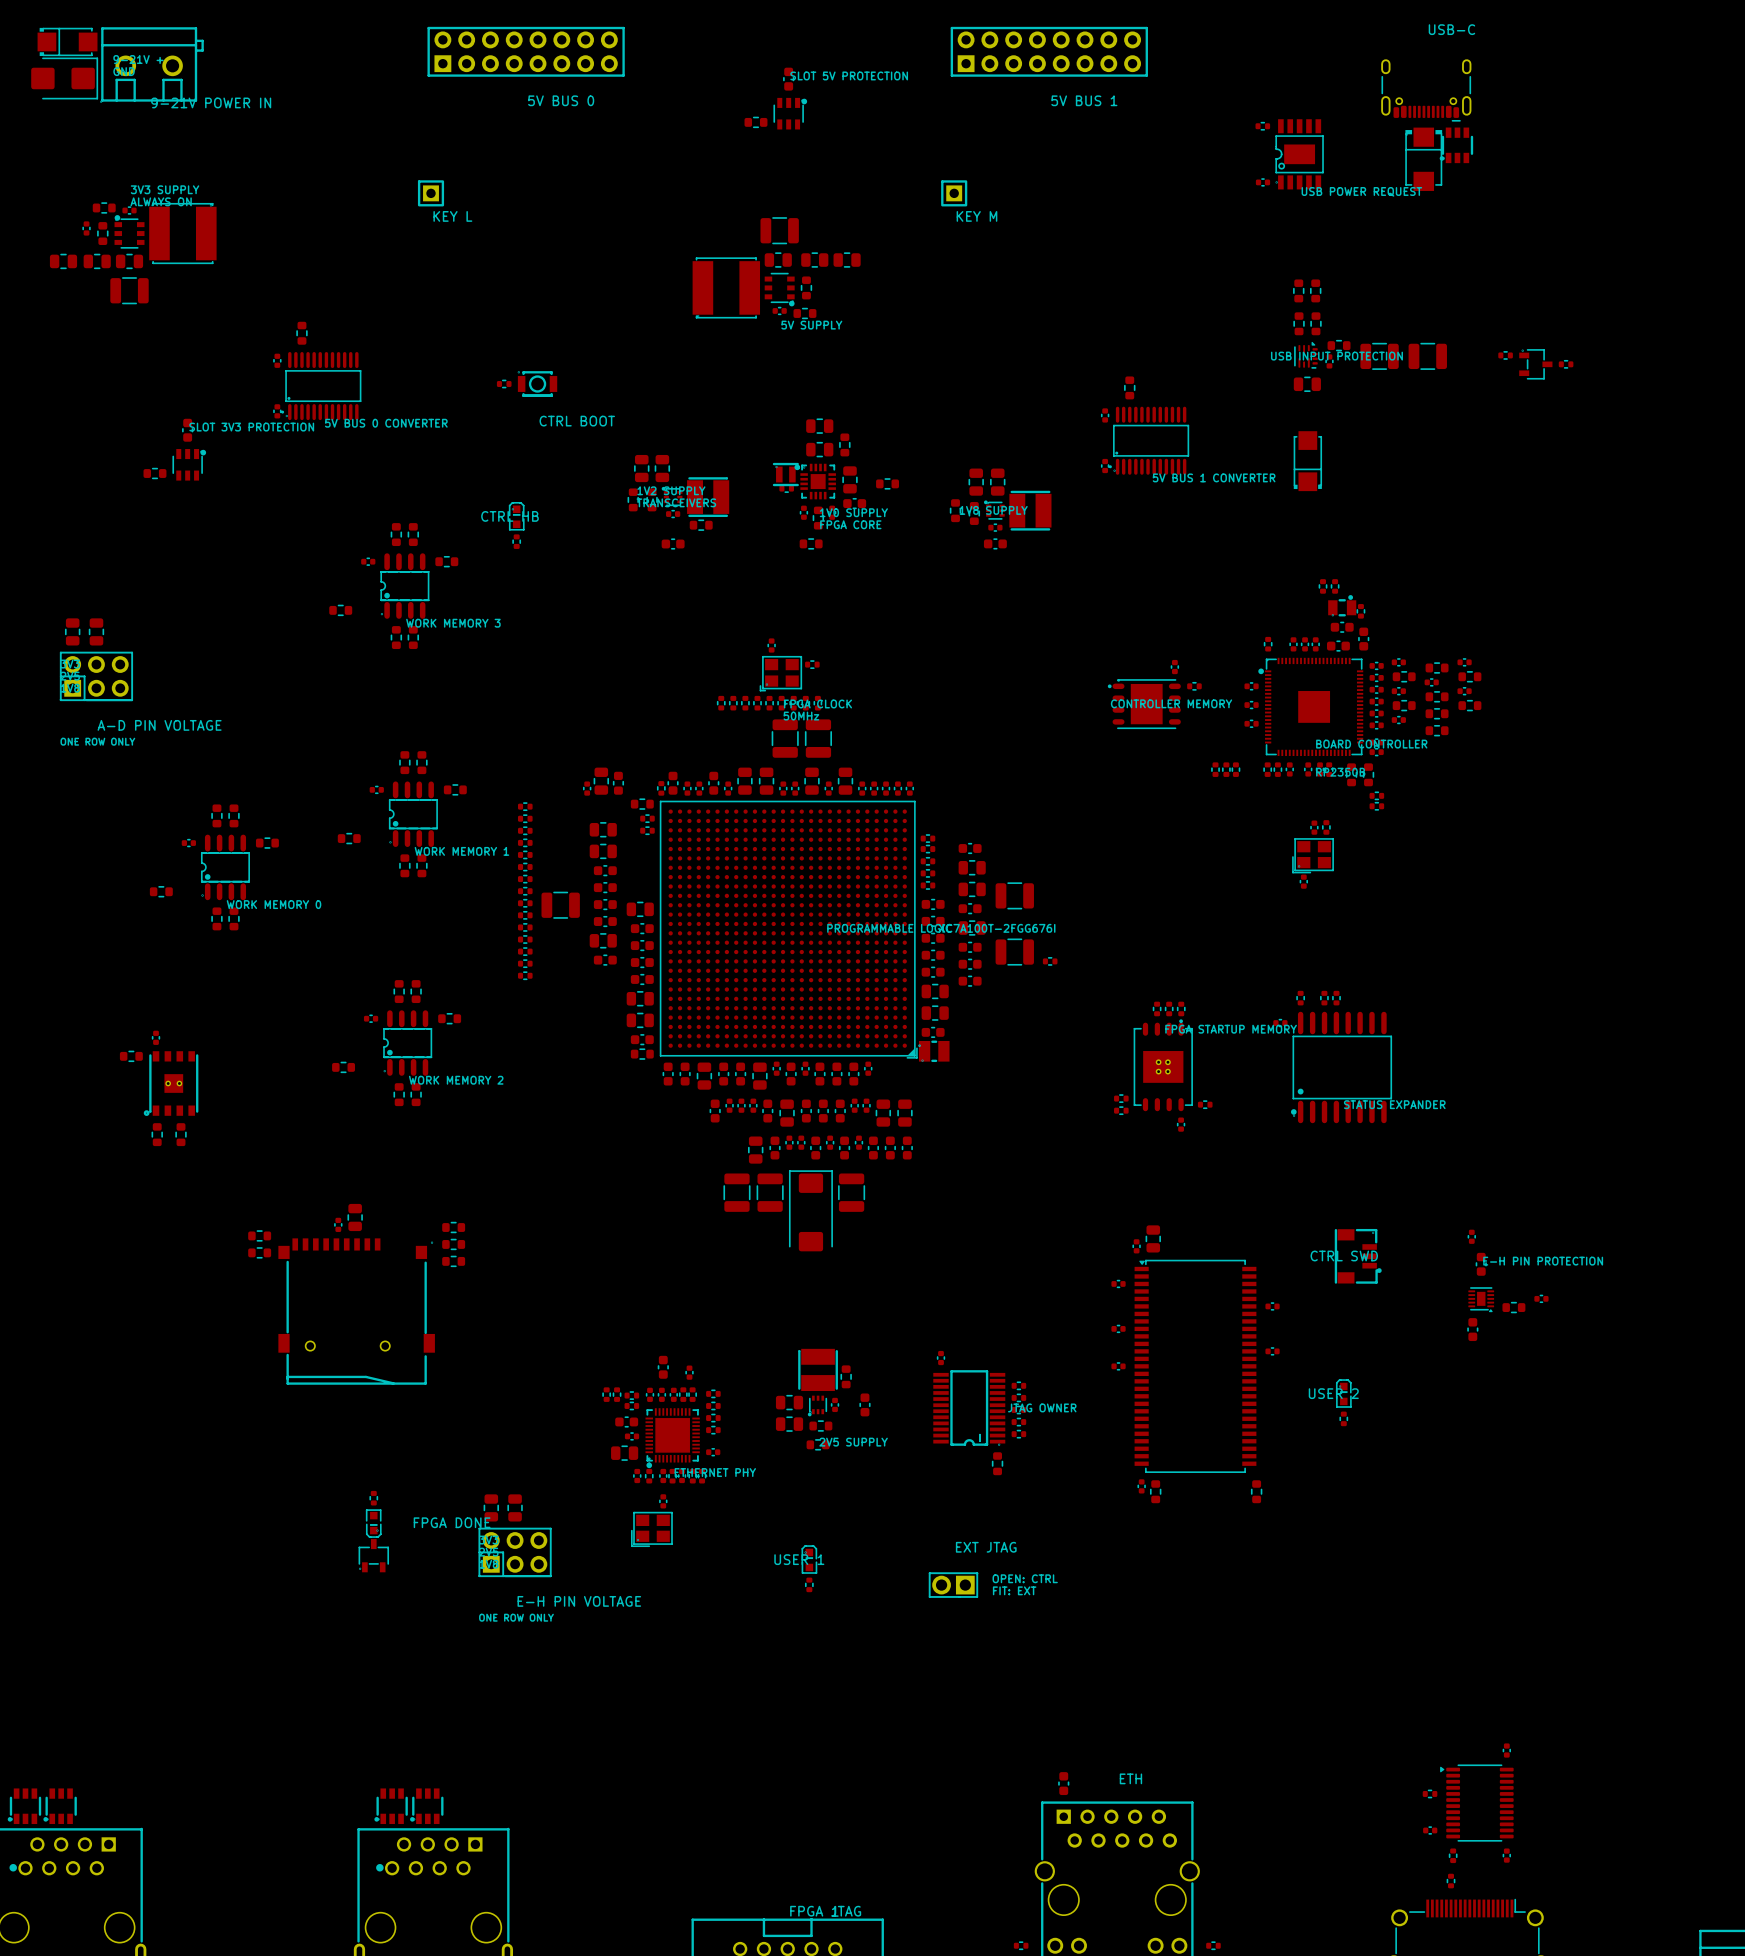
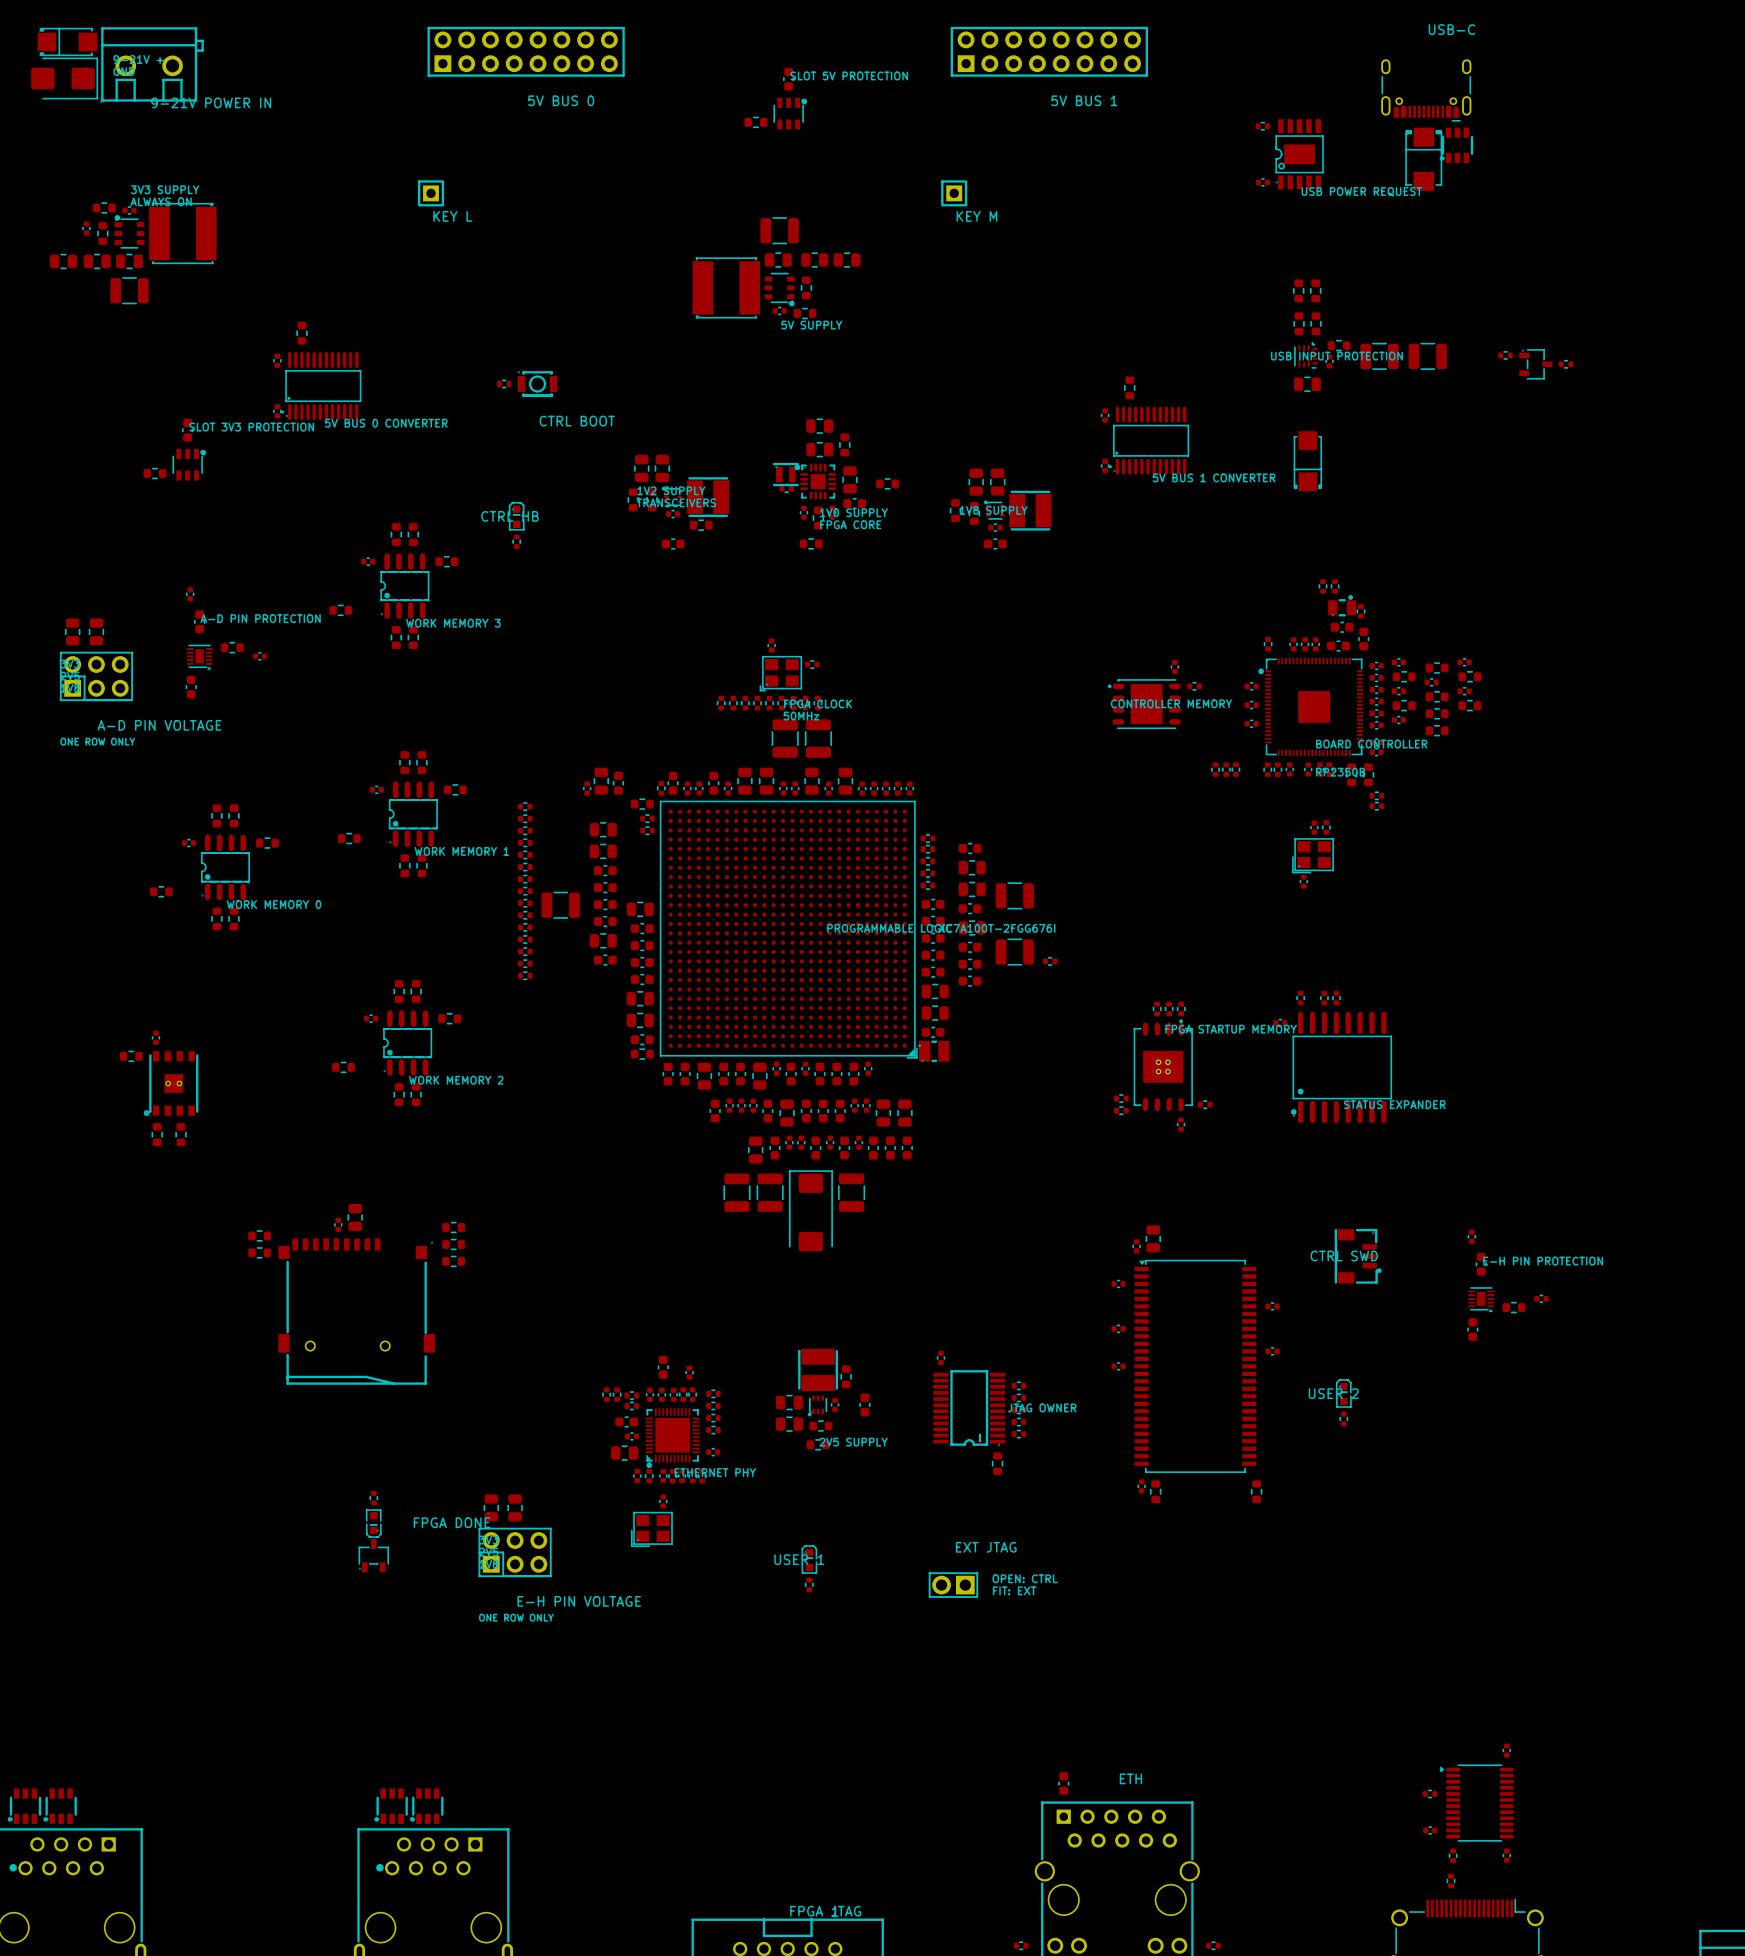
part: none -> (190, 594)
part: none -> (199, 621)
part: none -> (232, 647)
part: none -> (259, 656)
part: none -> (199, 657)
part: none -> (191, 687)

